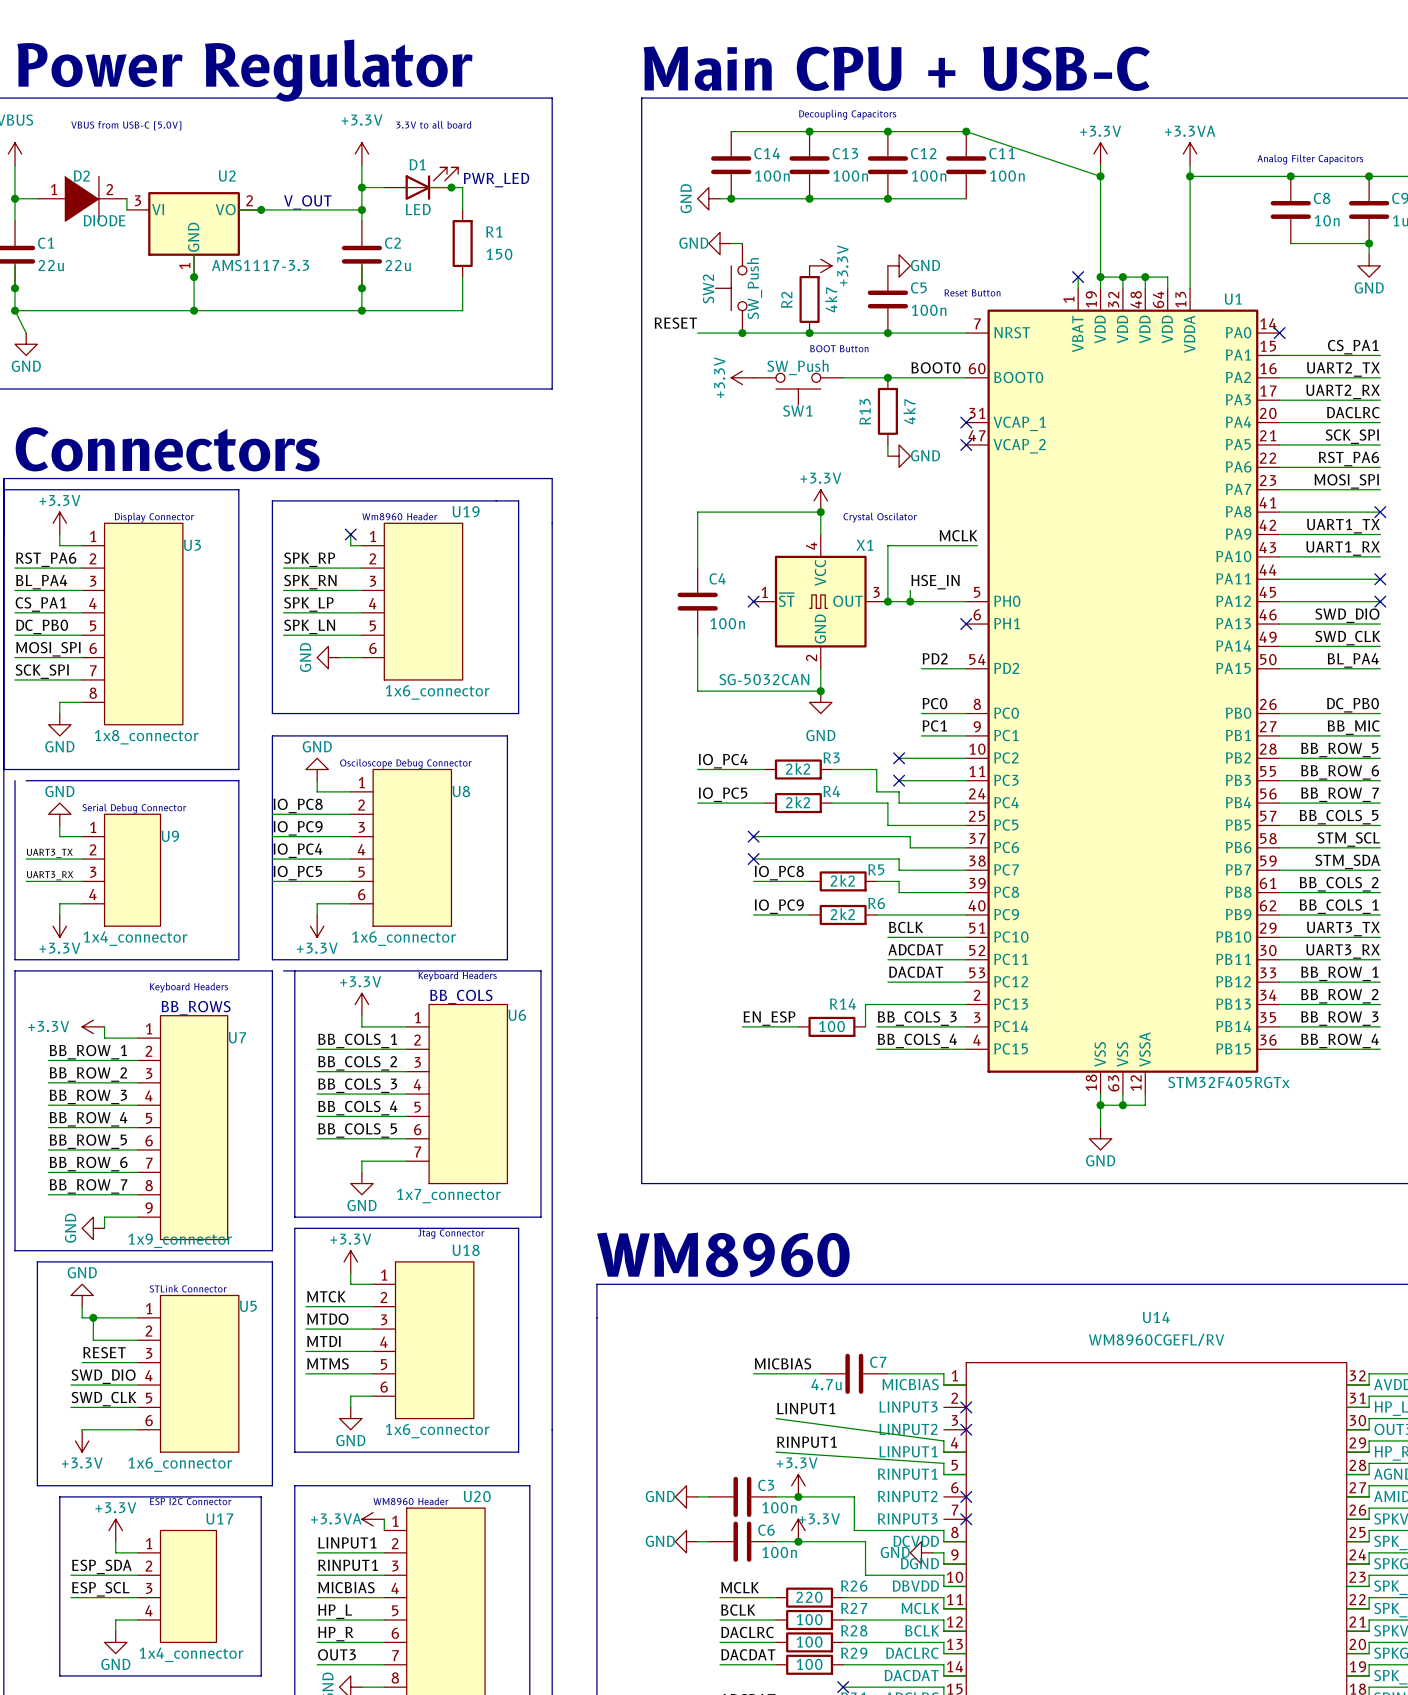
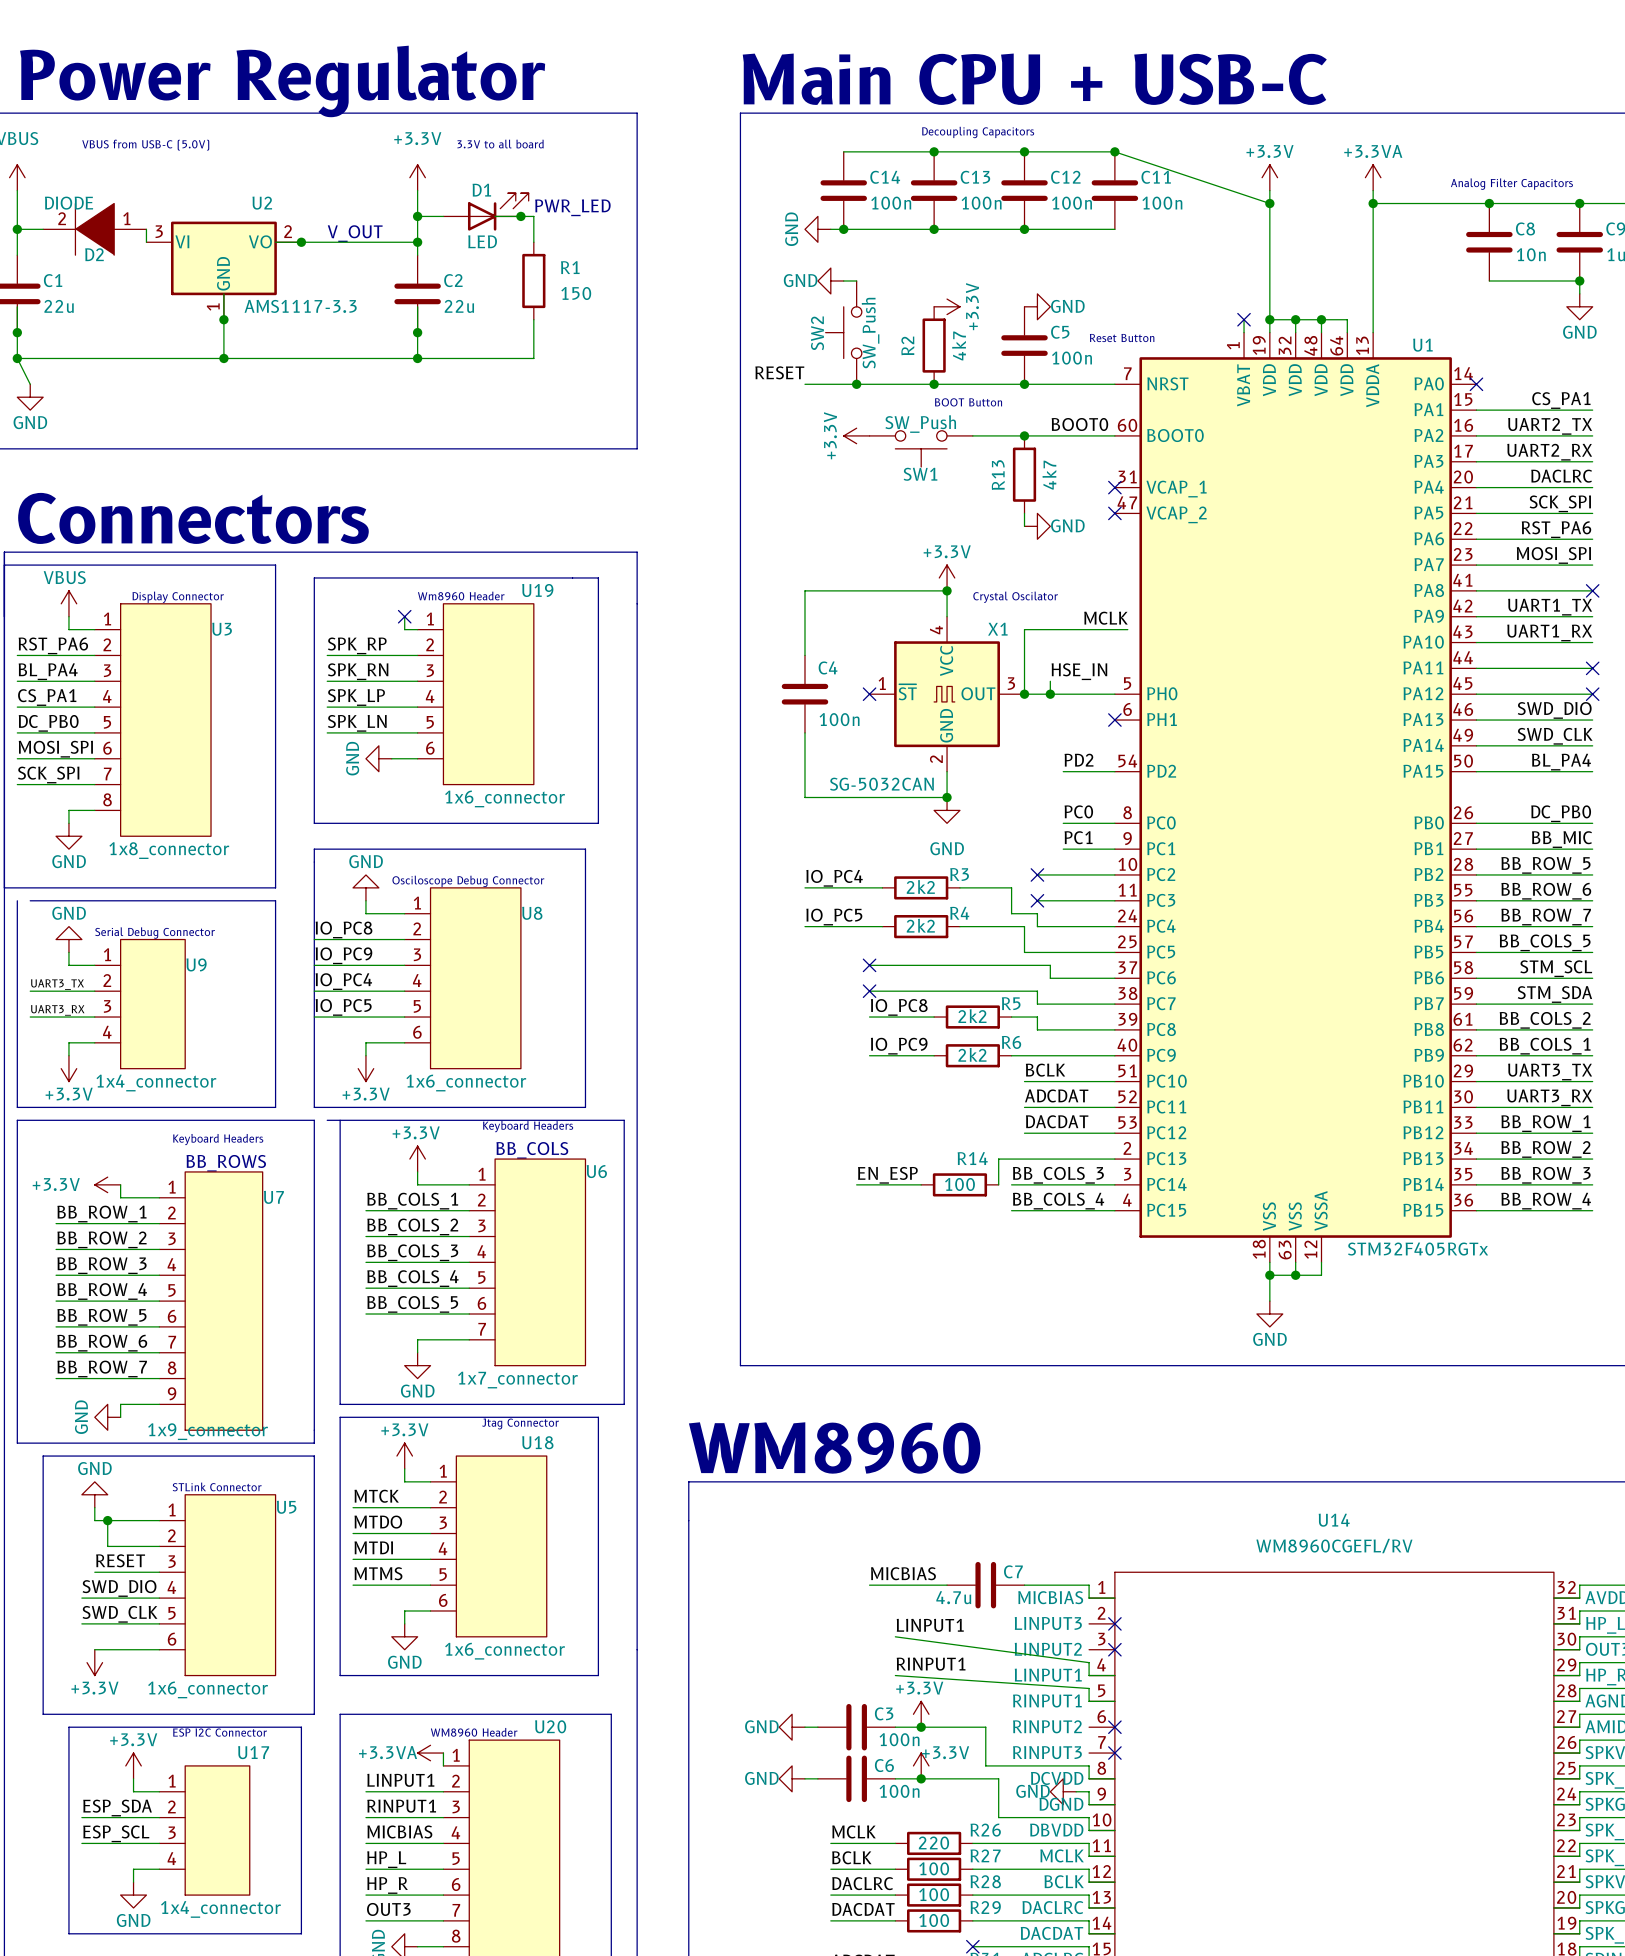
D2 rotation: 0° (82, 198) -> 180° (94, 229)
power symbol: +3.3V (59, 523) -> VBUS (68, 603)

